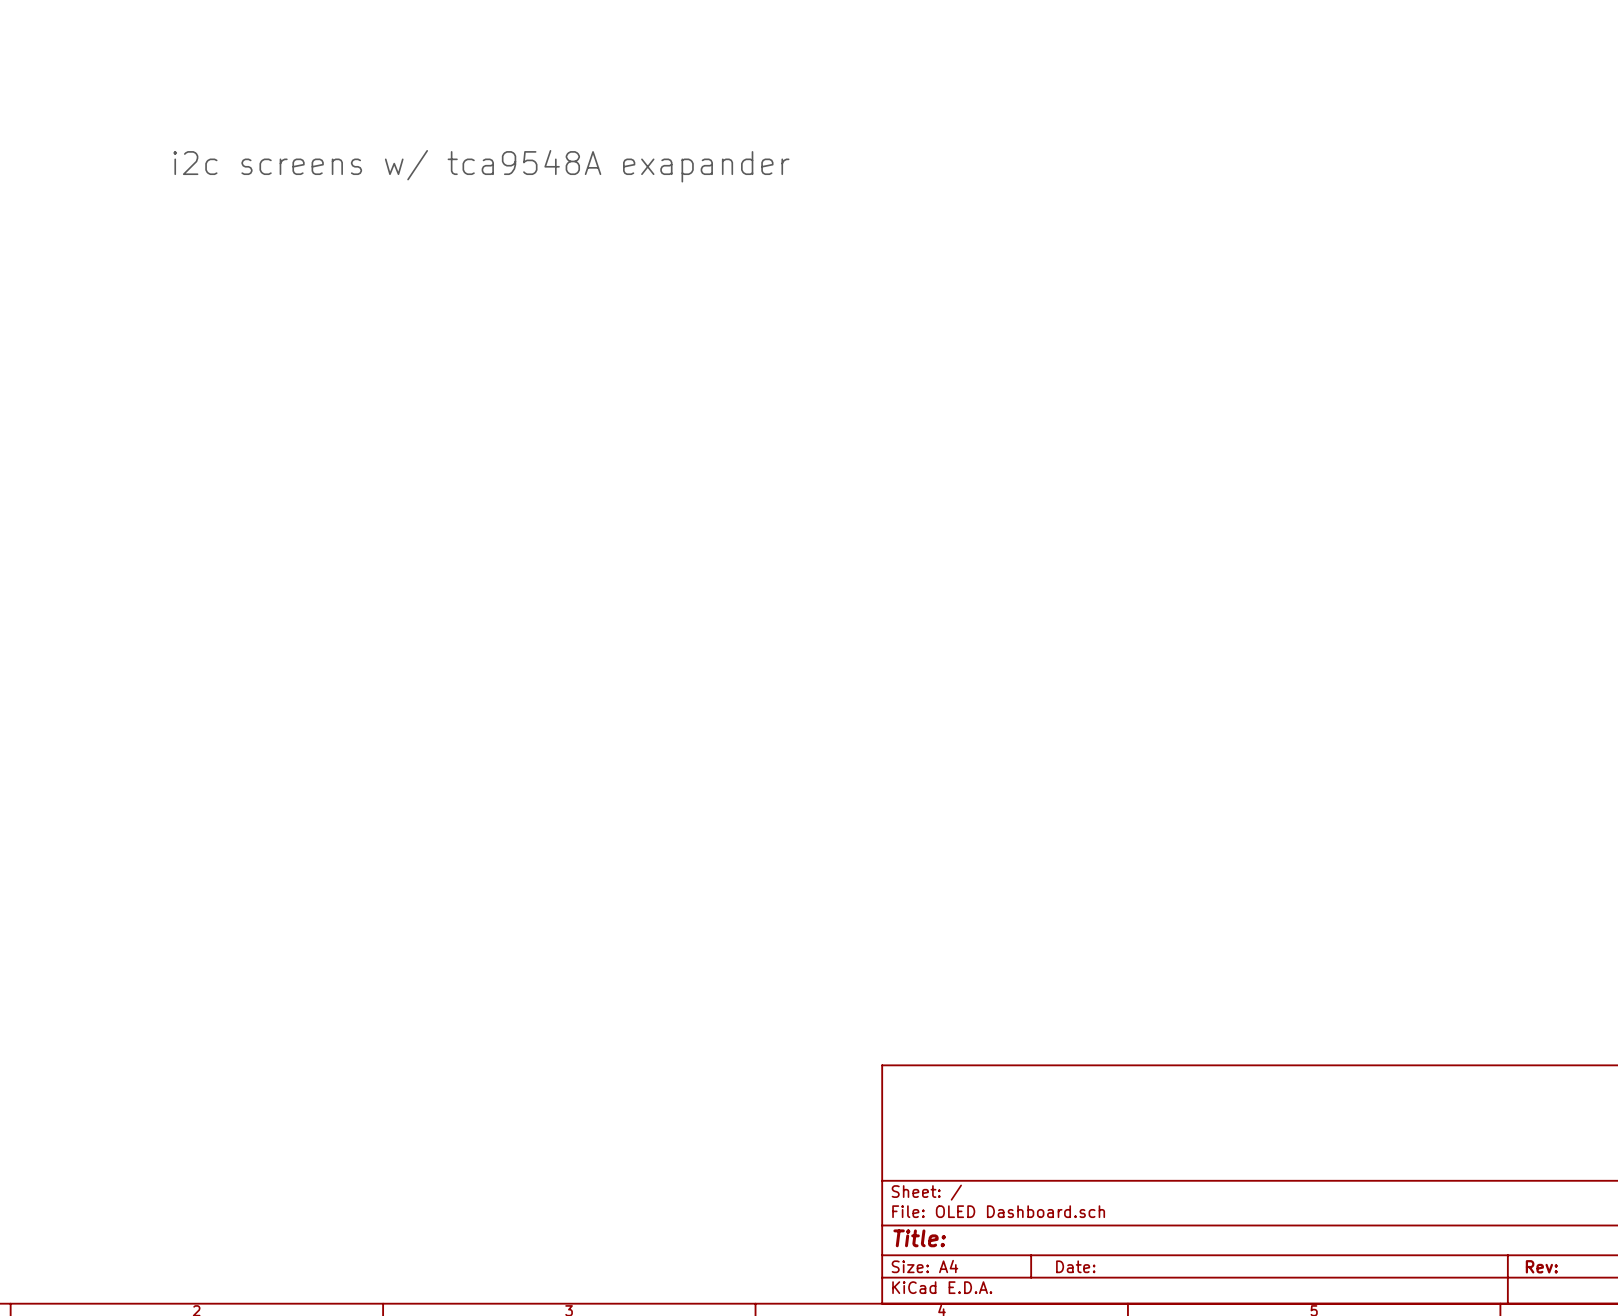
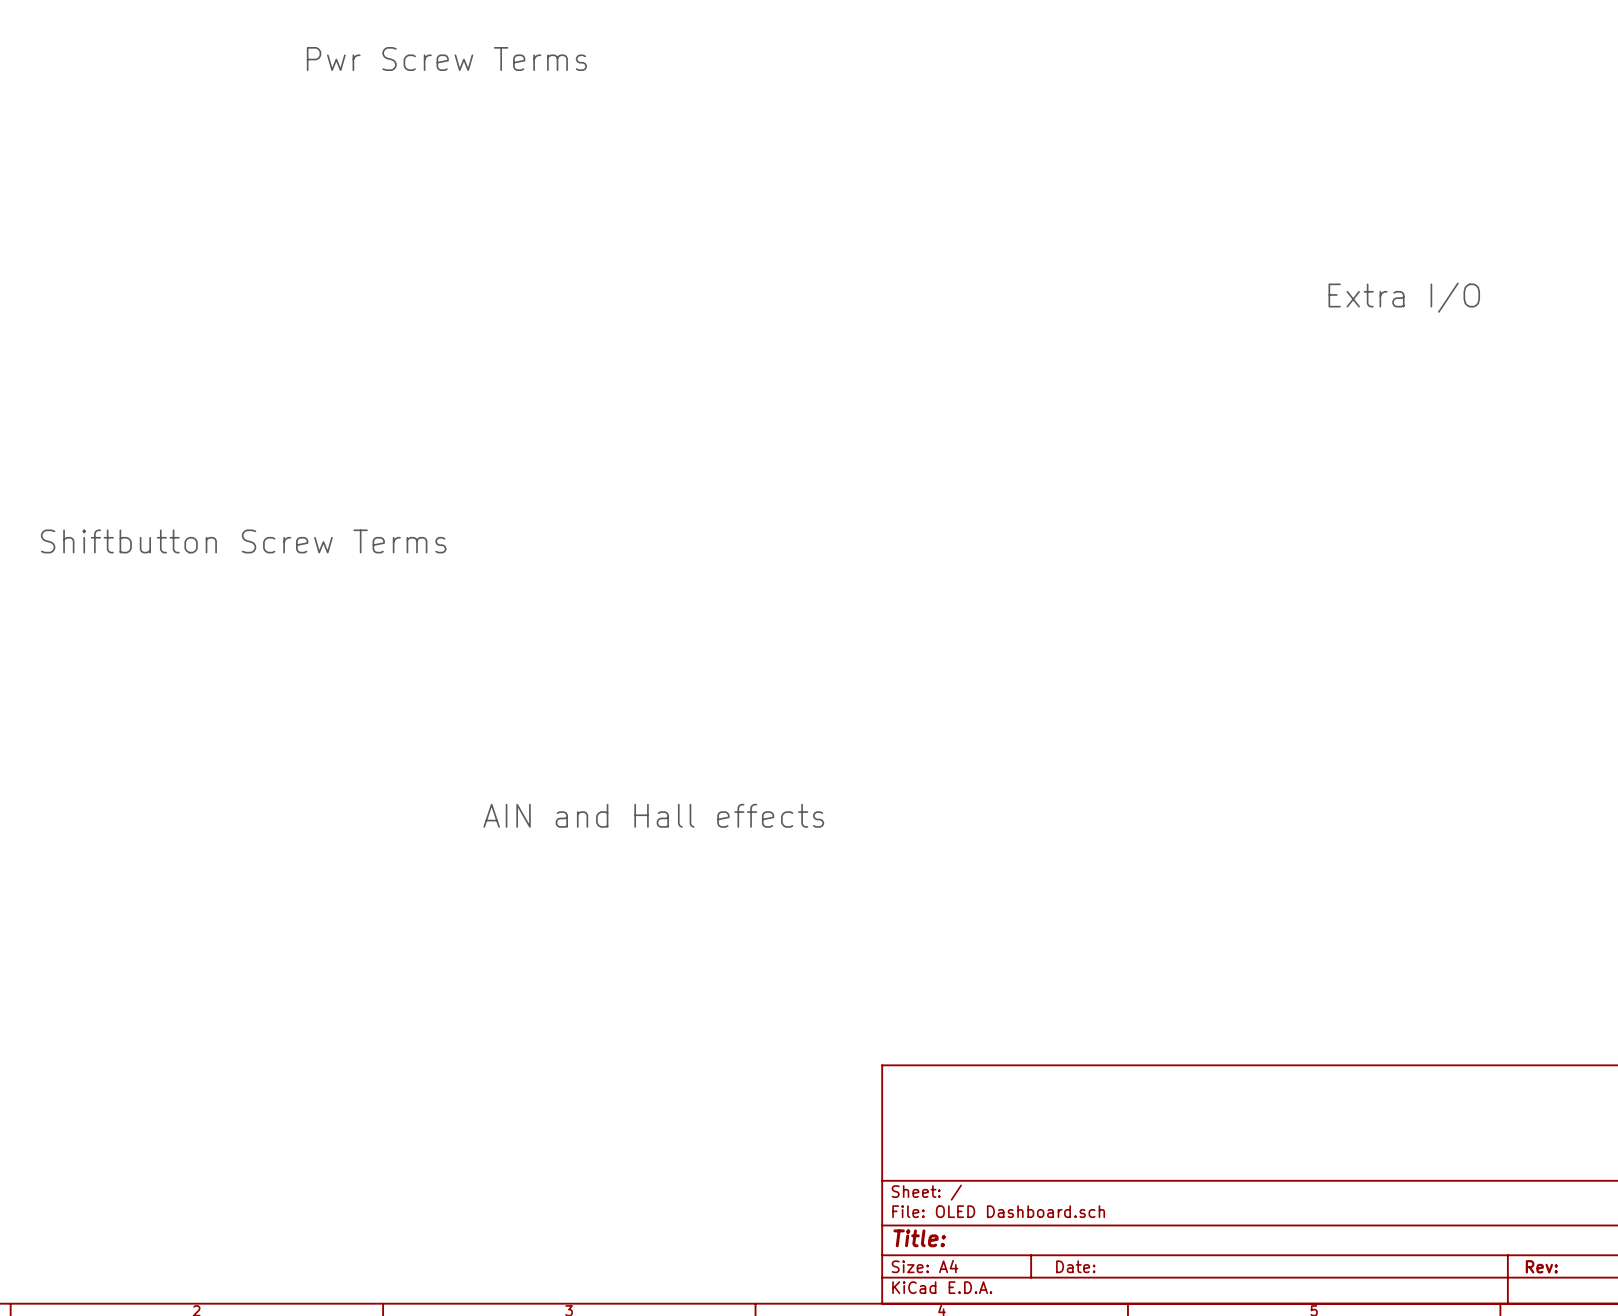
text: none -> Pwr Screw Terms (446, 59)
text: i2c screens w/ tca9548A exapander (481, 166) -> none
text: none -> Extra I/O (1404, 297)
text: none -> Shiftbutton Screw Terms (243, 541)
text: none -> AIN and Hall effects (653, 815)

